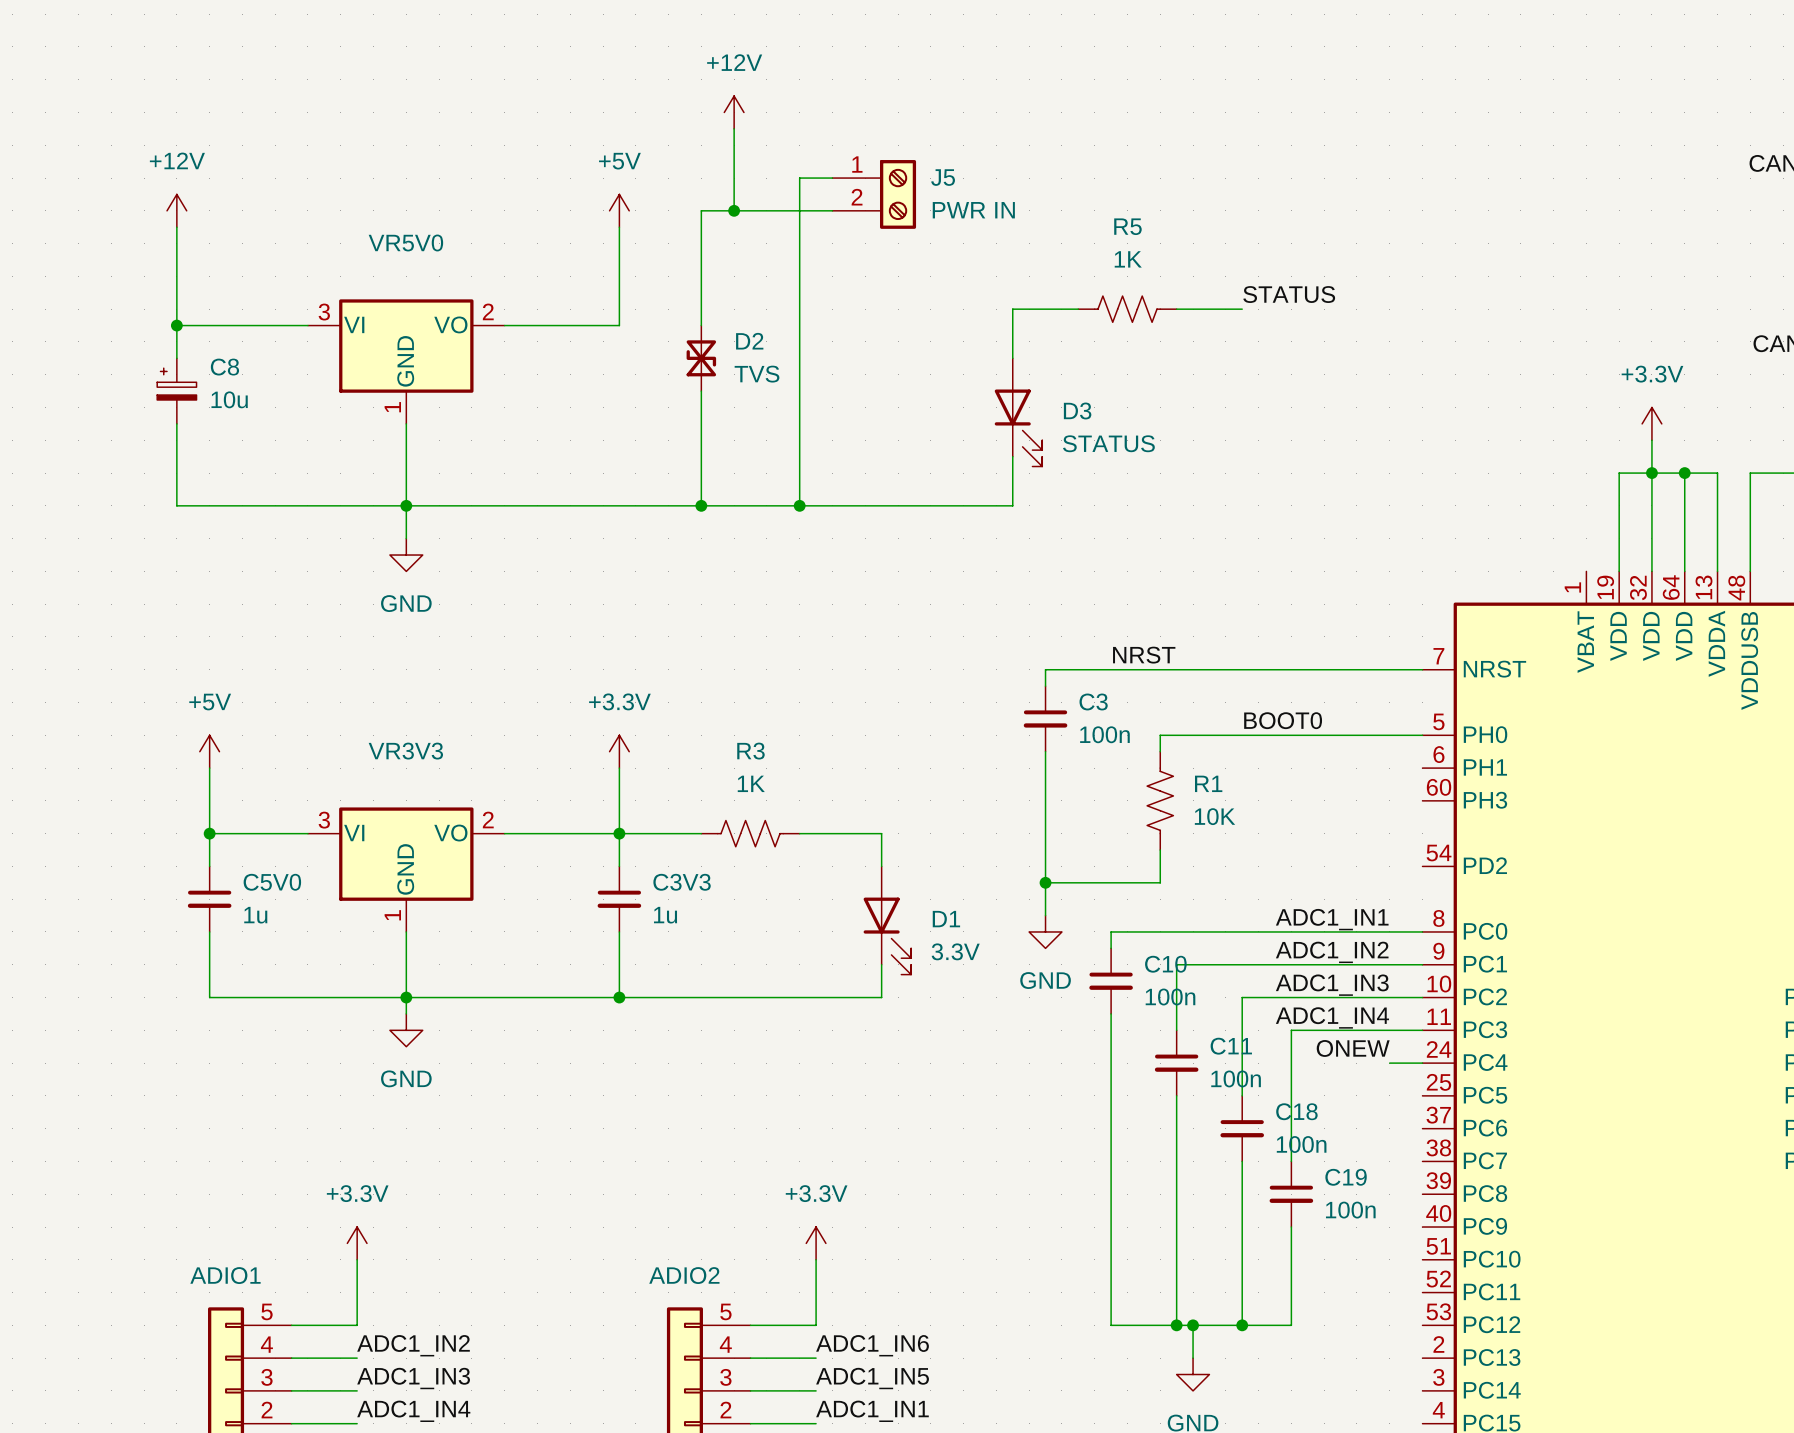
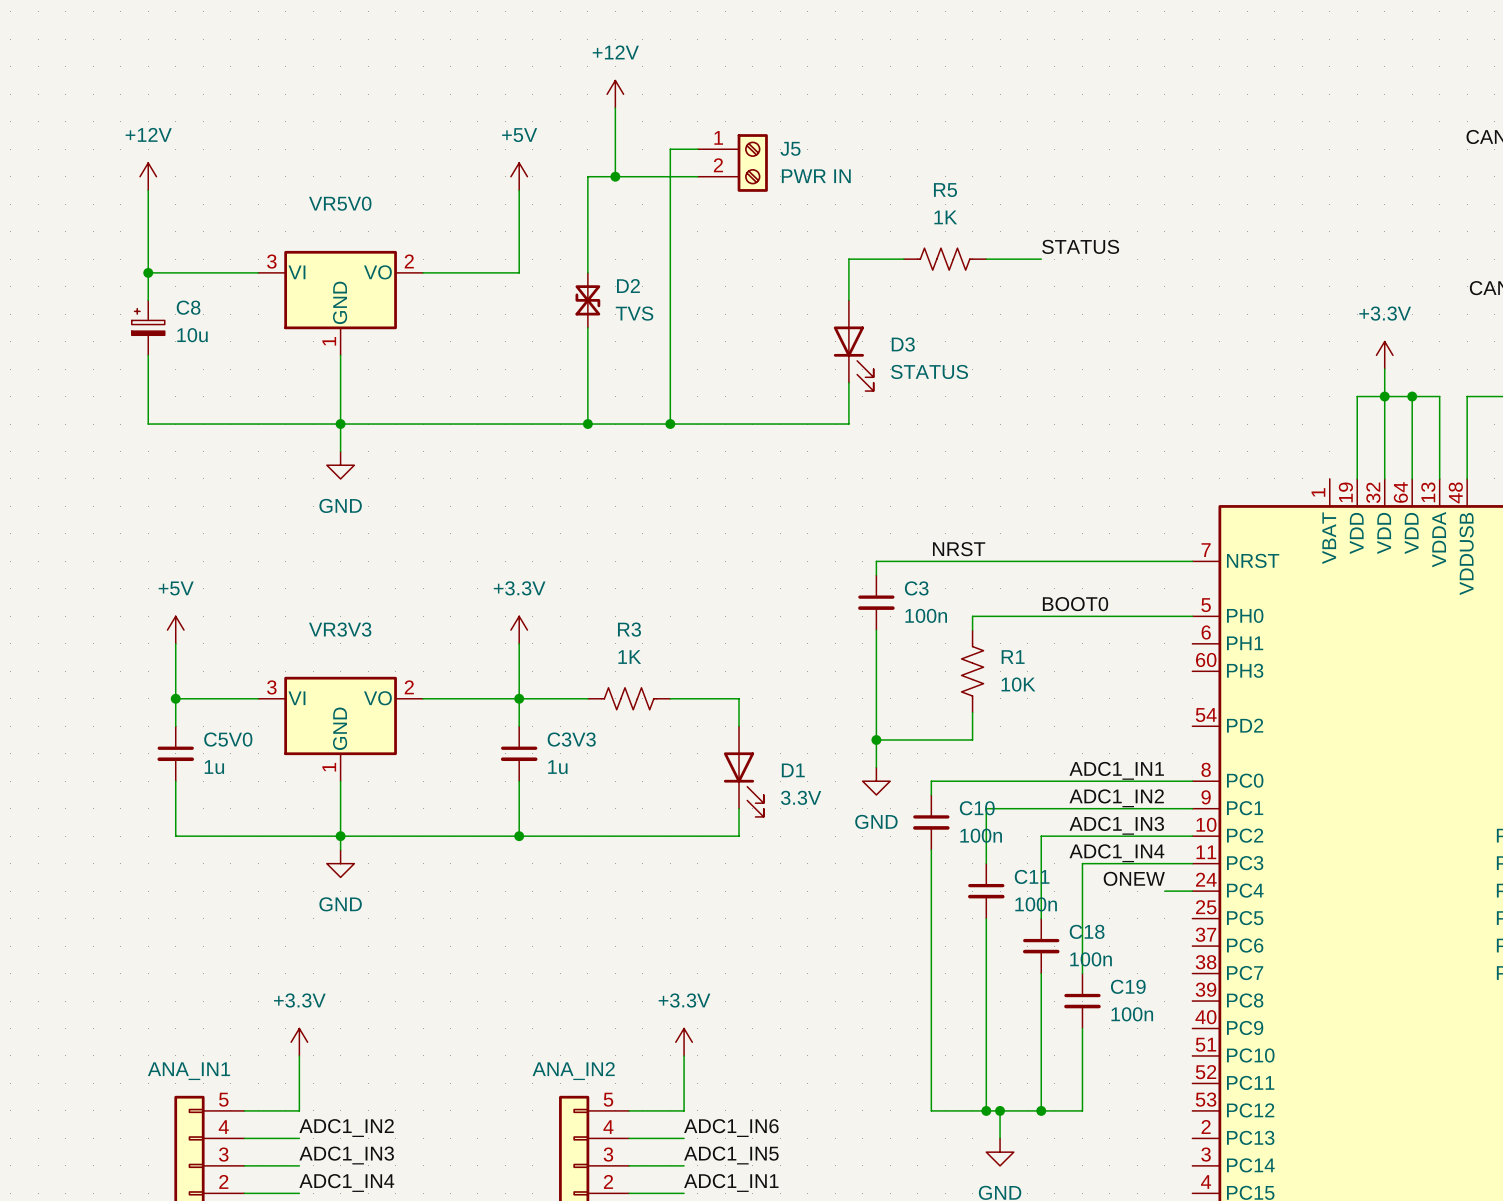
ADIO1 name: ADIO1 (225, 1275) -> ANA_IN1 (189, 1071)
ADIO2 name: ADIO2 (684, 1275) -> ANA_IN2 (573, 1071)

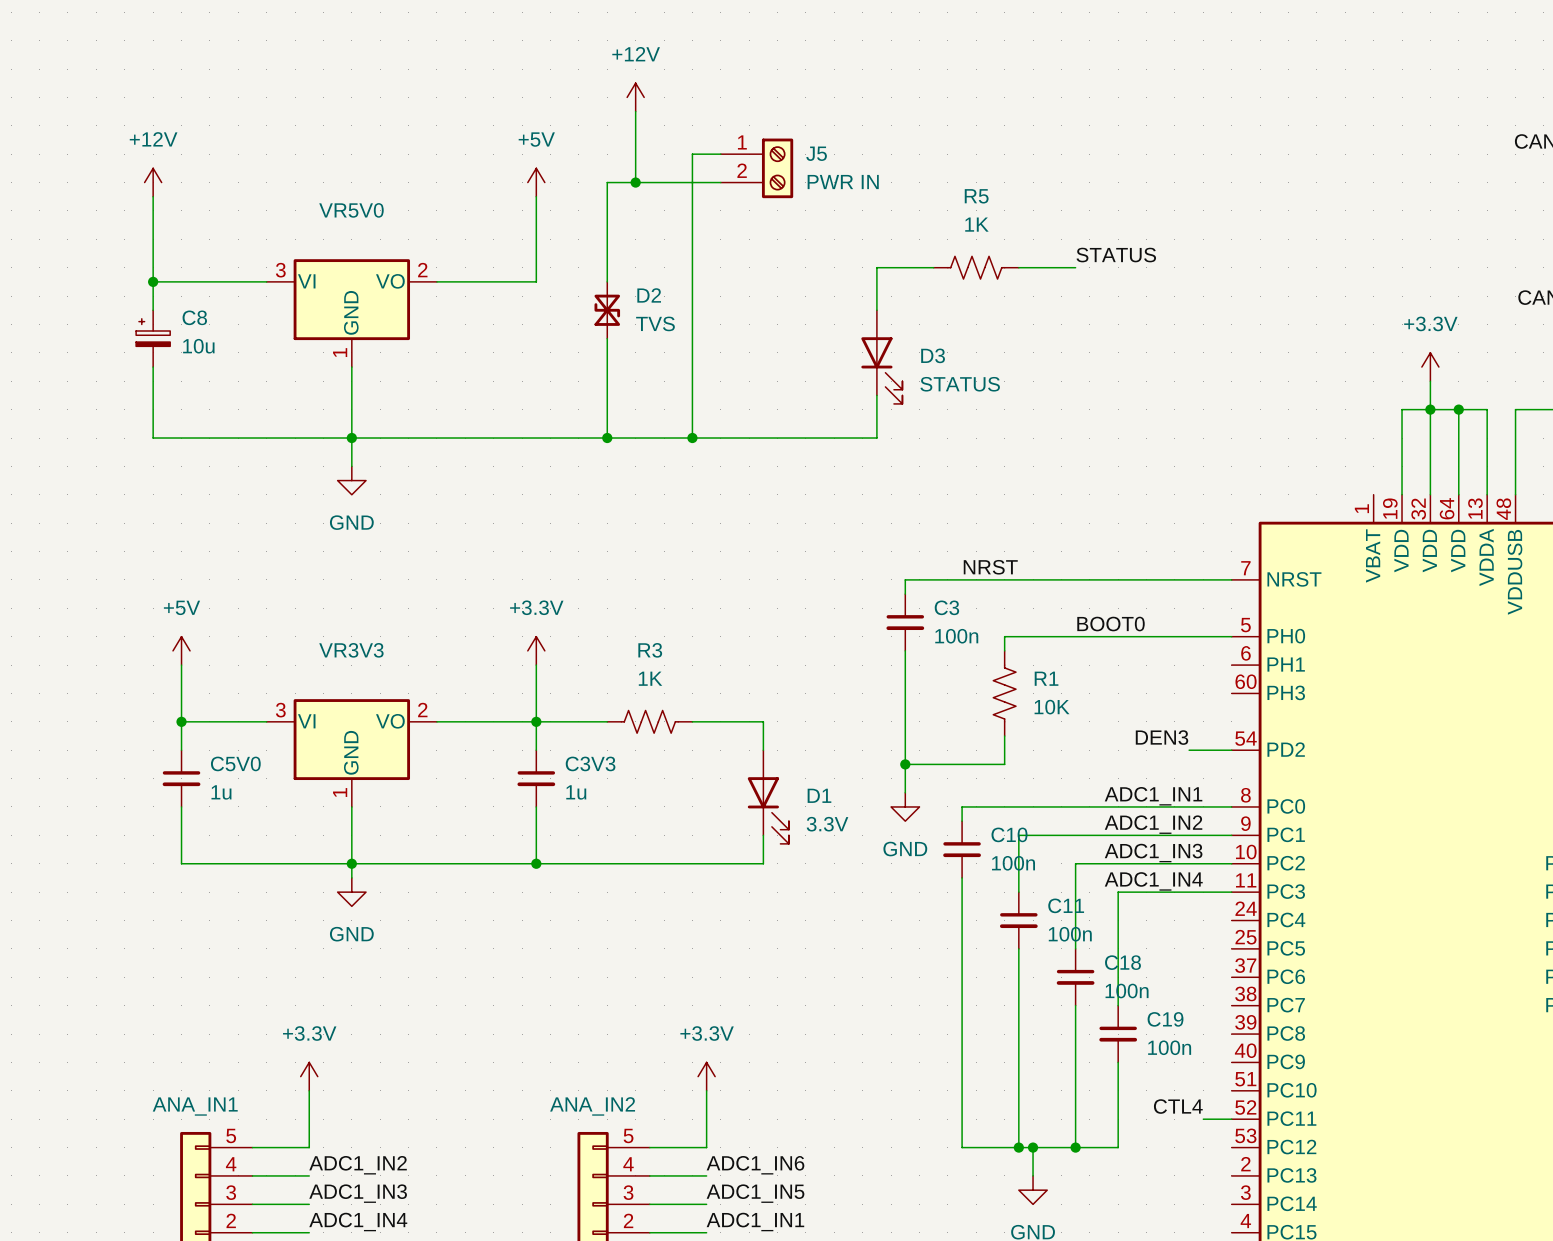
label: none -> DEN3 (1162, 737)
wire: none -> (1189, 750) (1231, 750)
label: ONEW (1134, 878) -> none
wire: (1164, 891) (1192, 891) -> (1203, 1119) (1231, 1119)
label: none -> CTL4 (1178, 1106)

